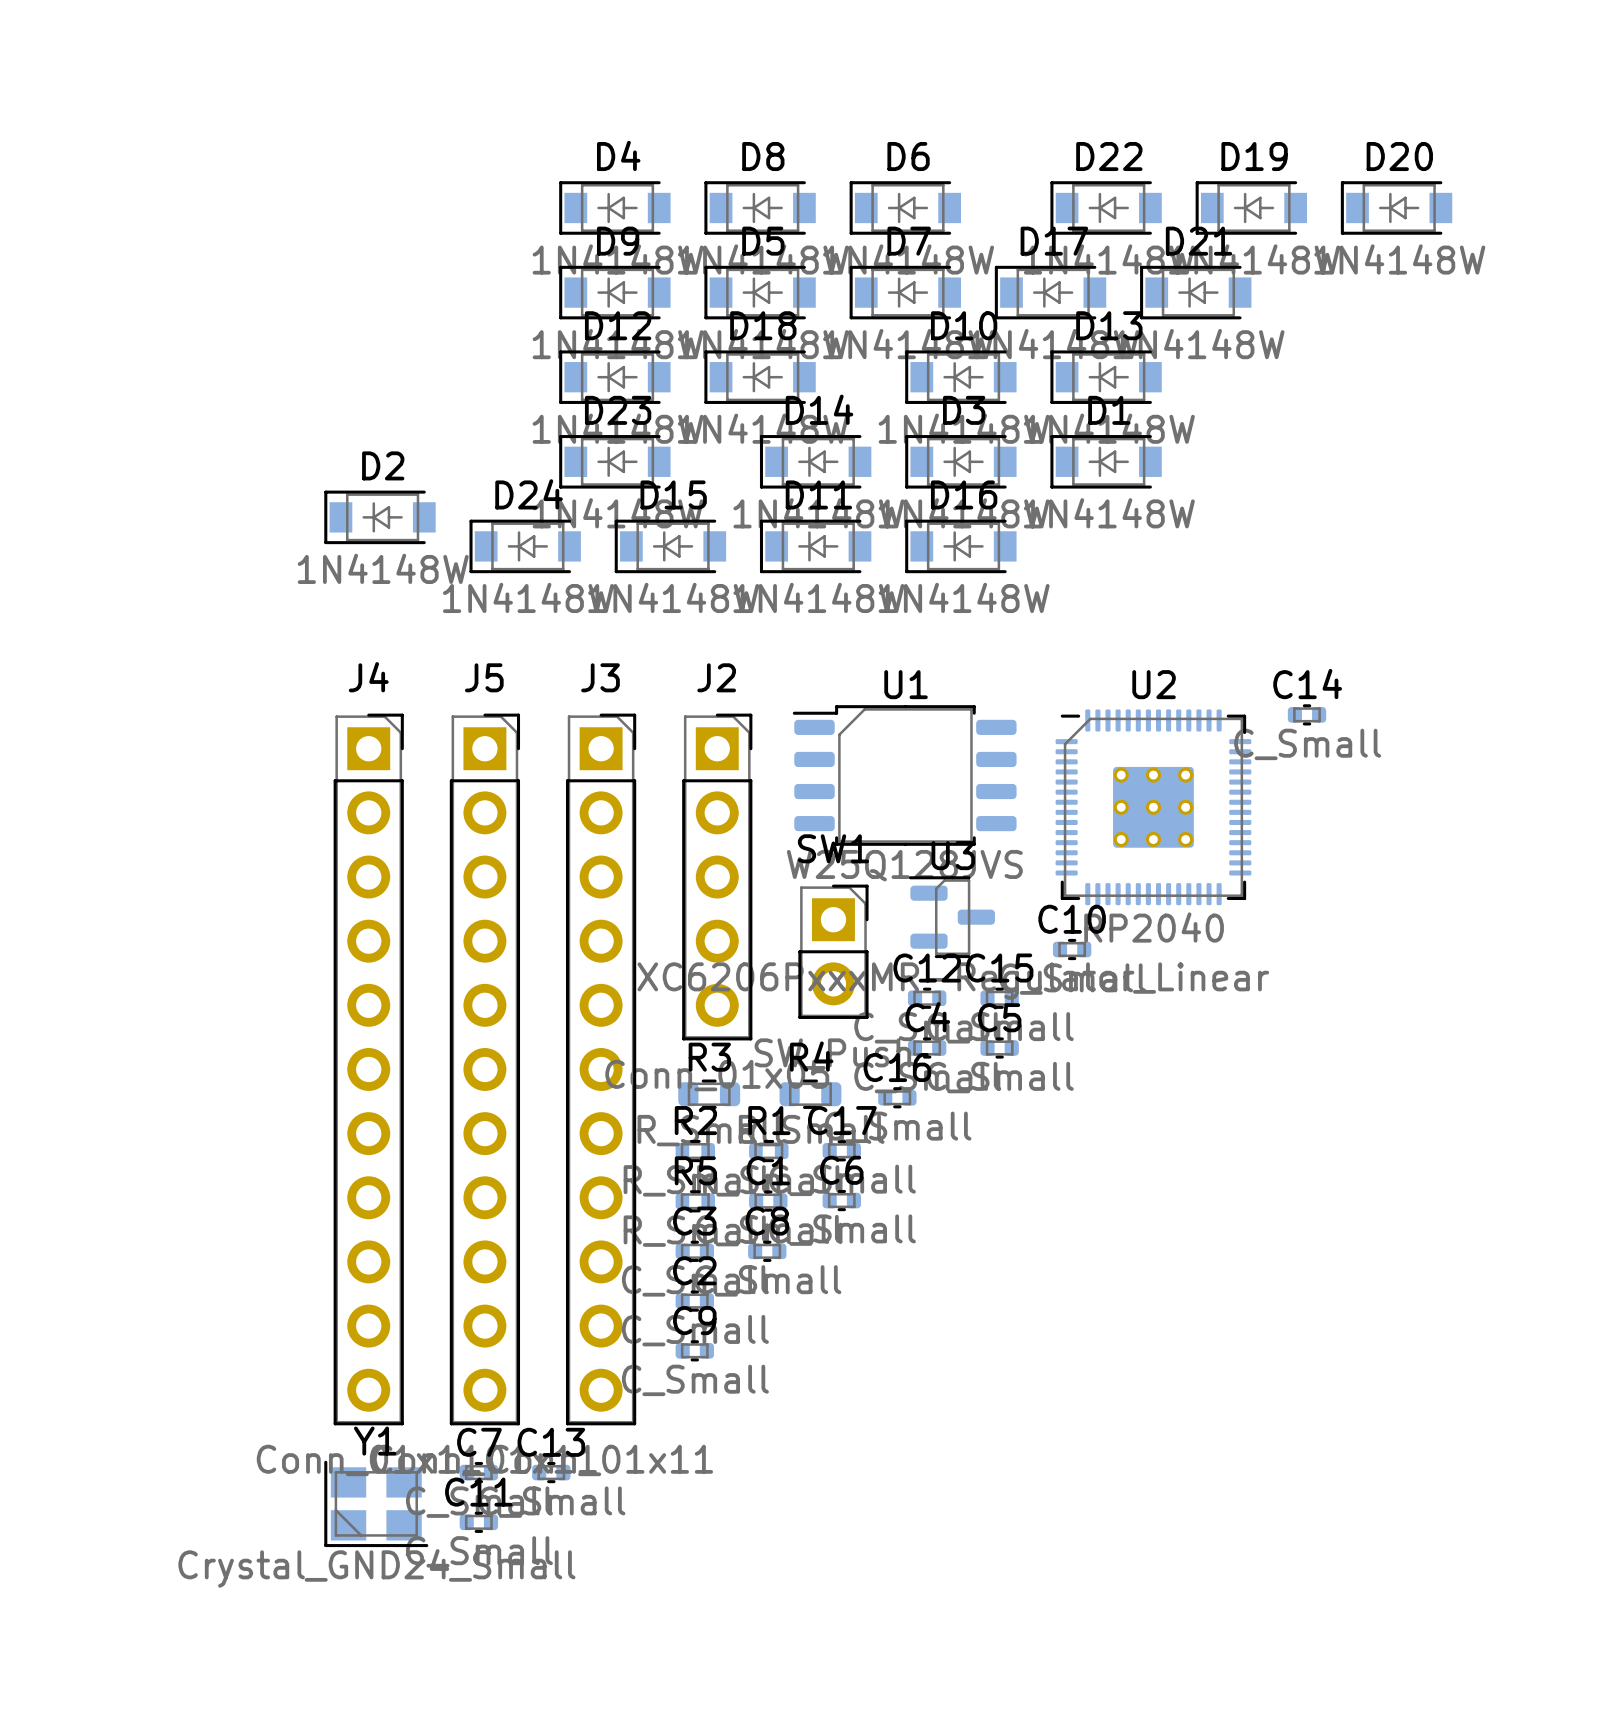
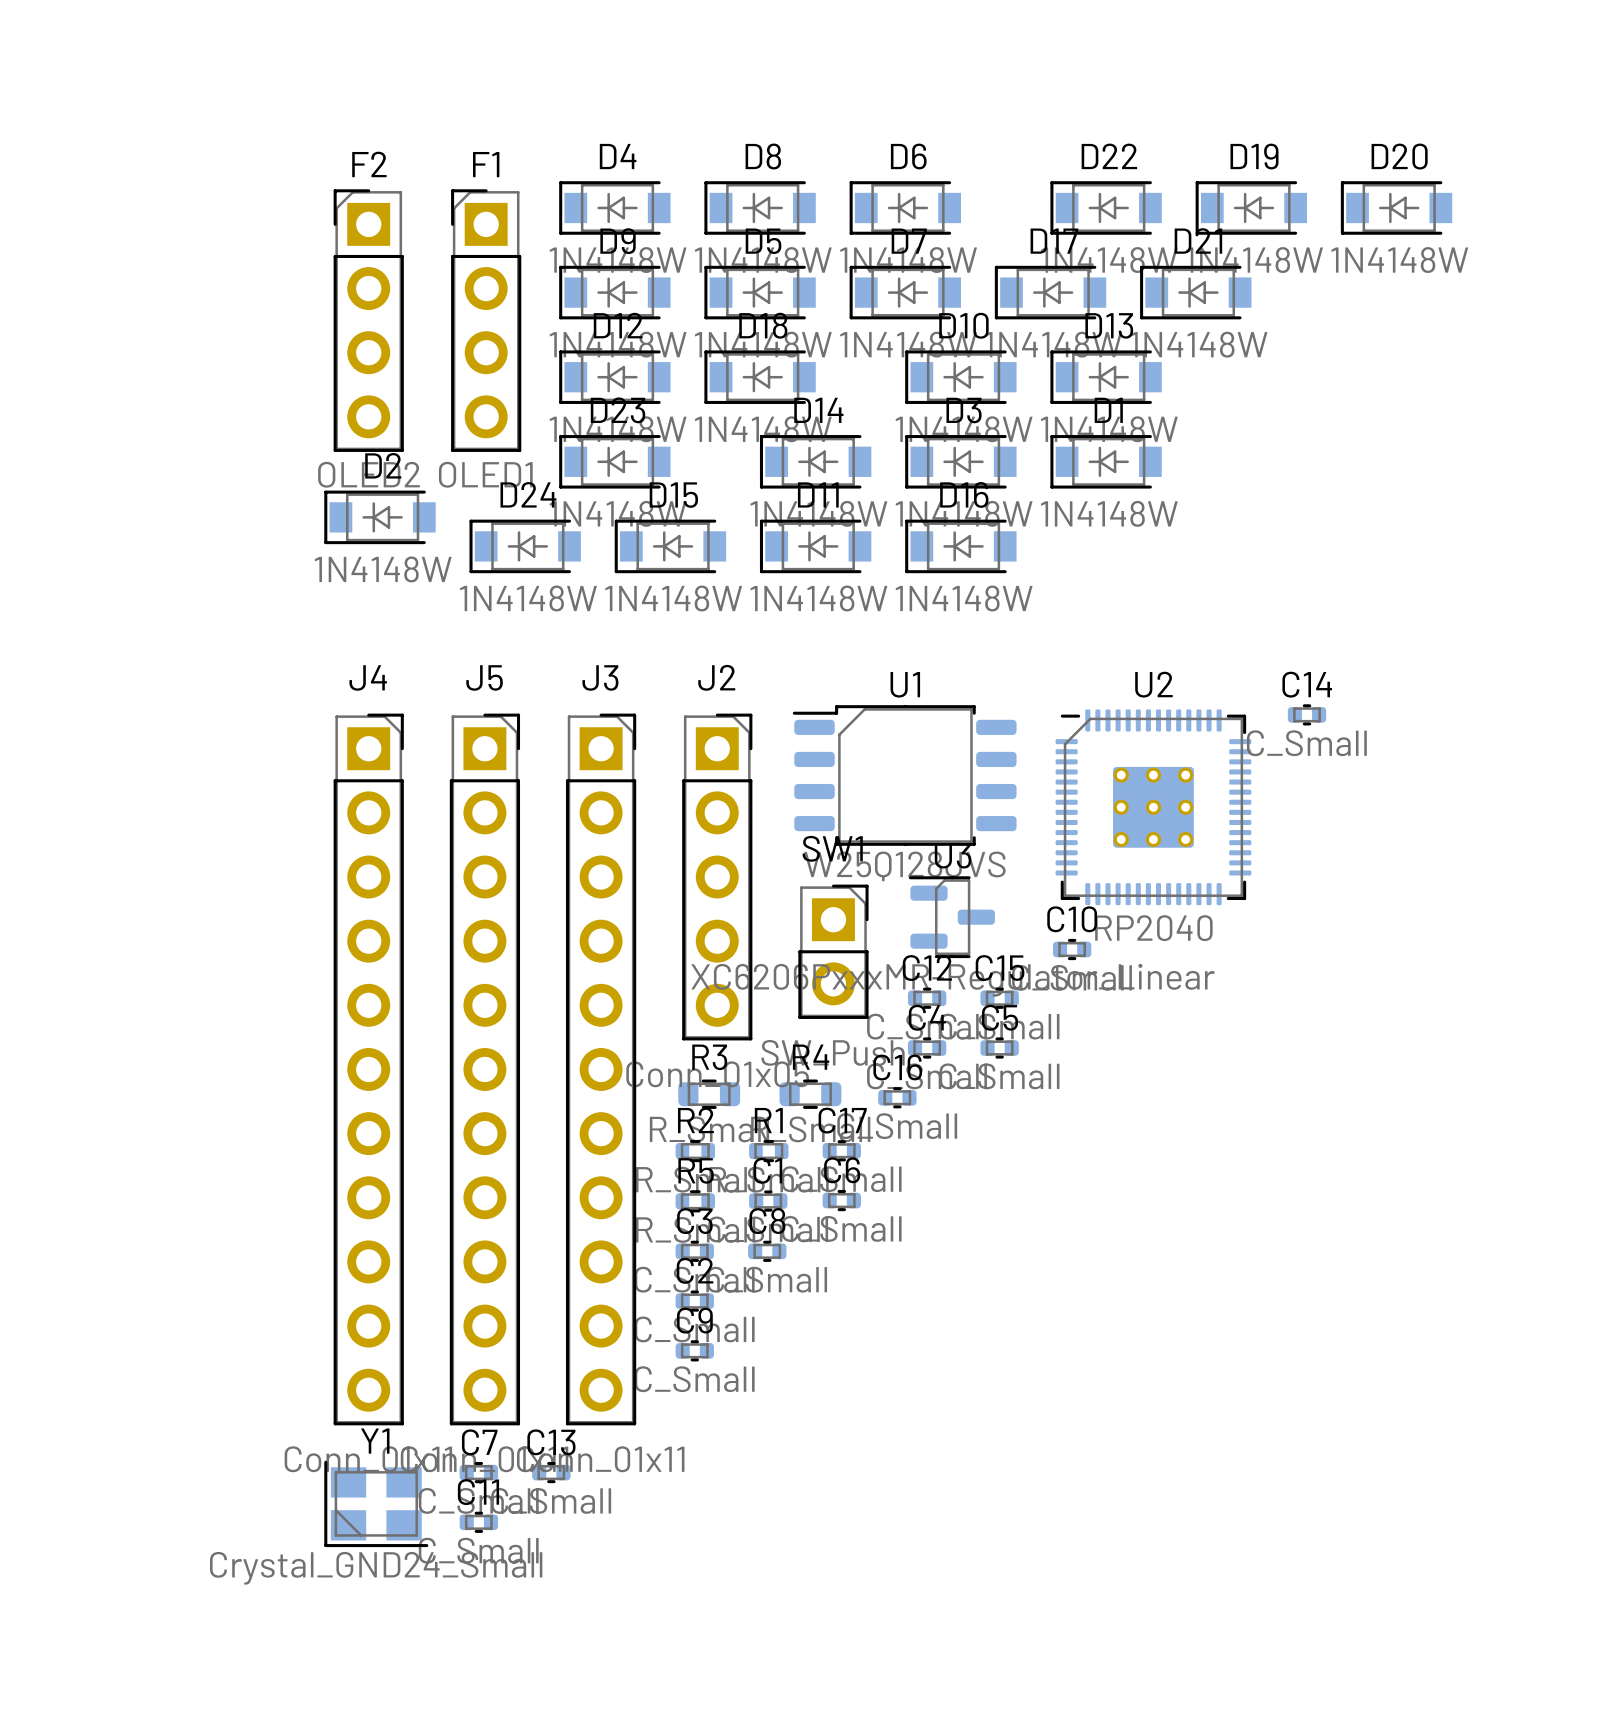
F2: none -> OLED2 (368, 320)
F1: none -> OLED1 (486, 320)

